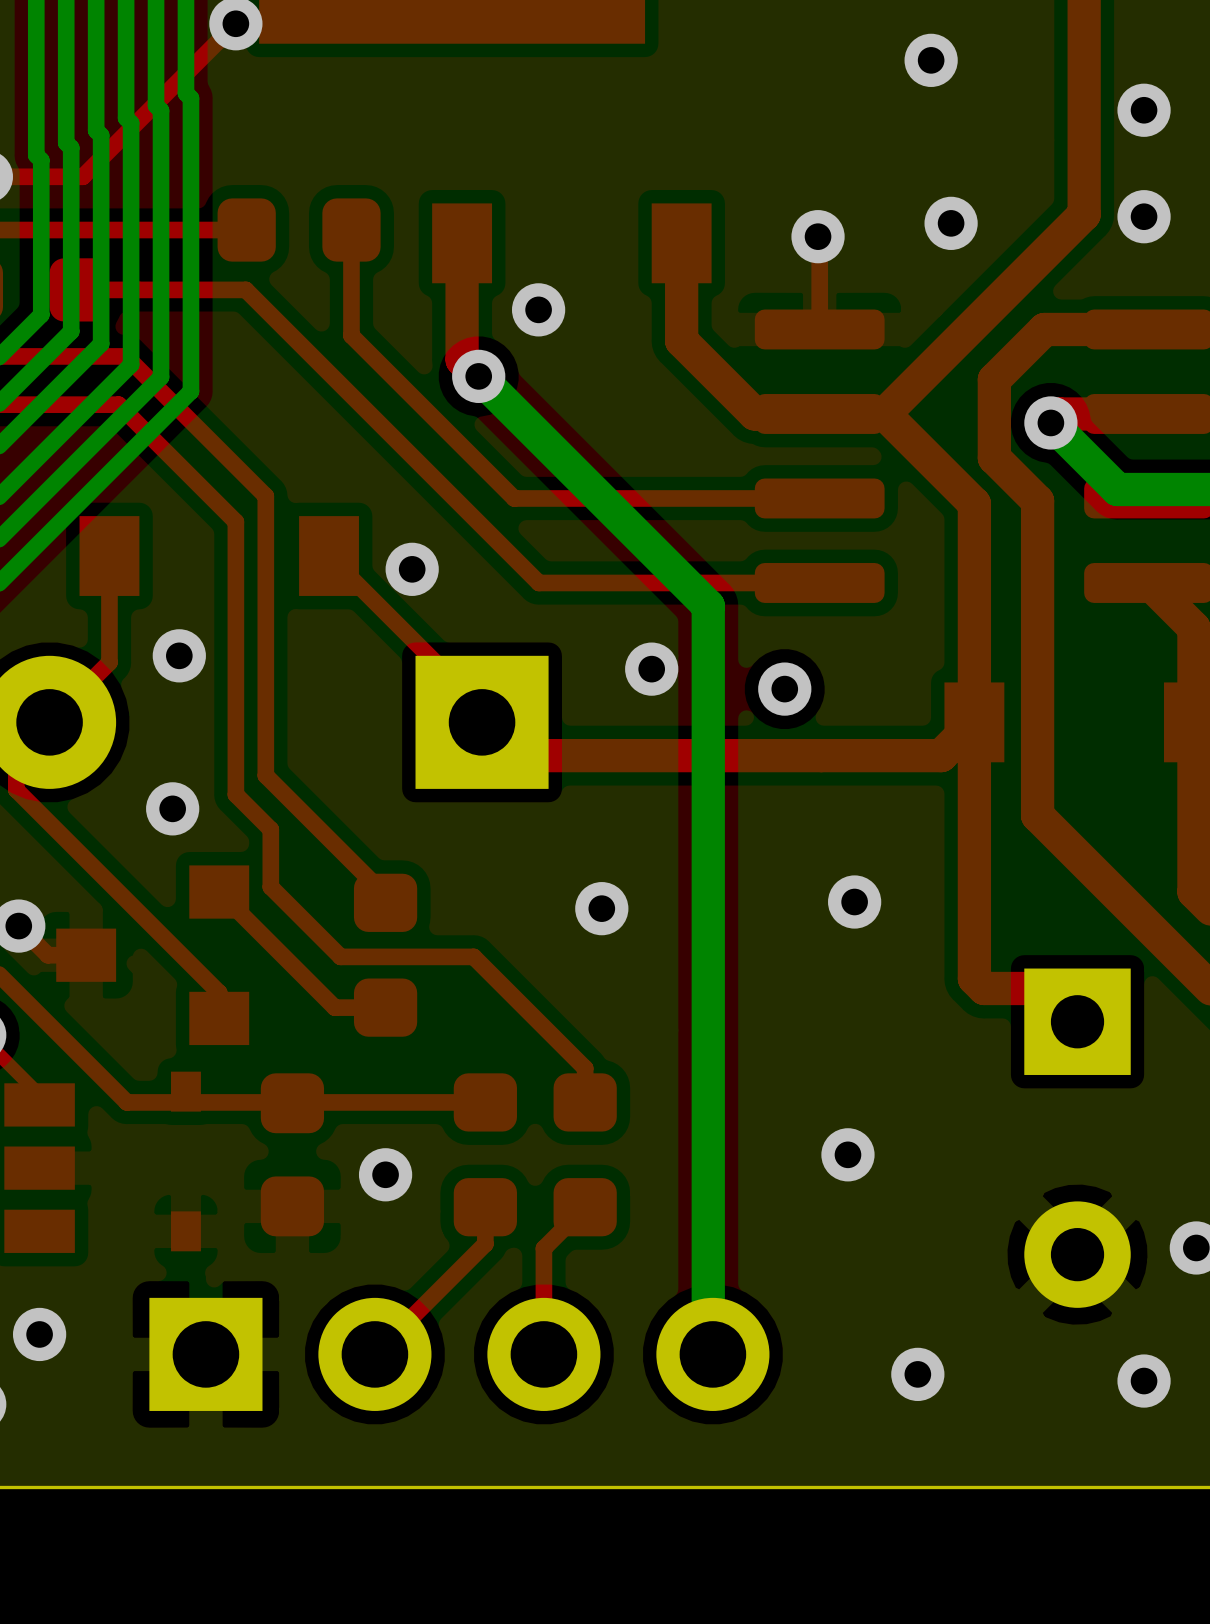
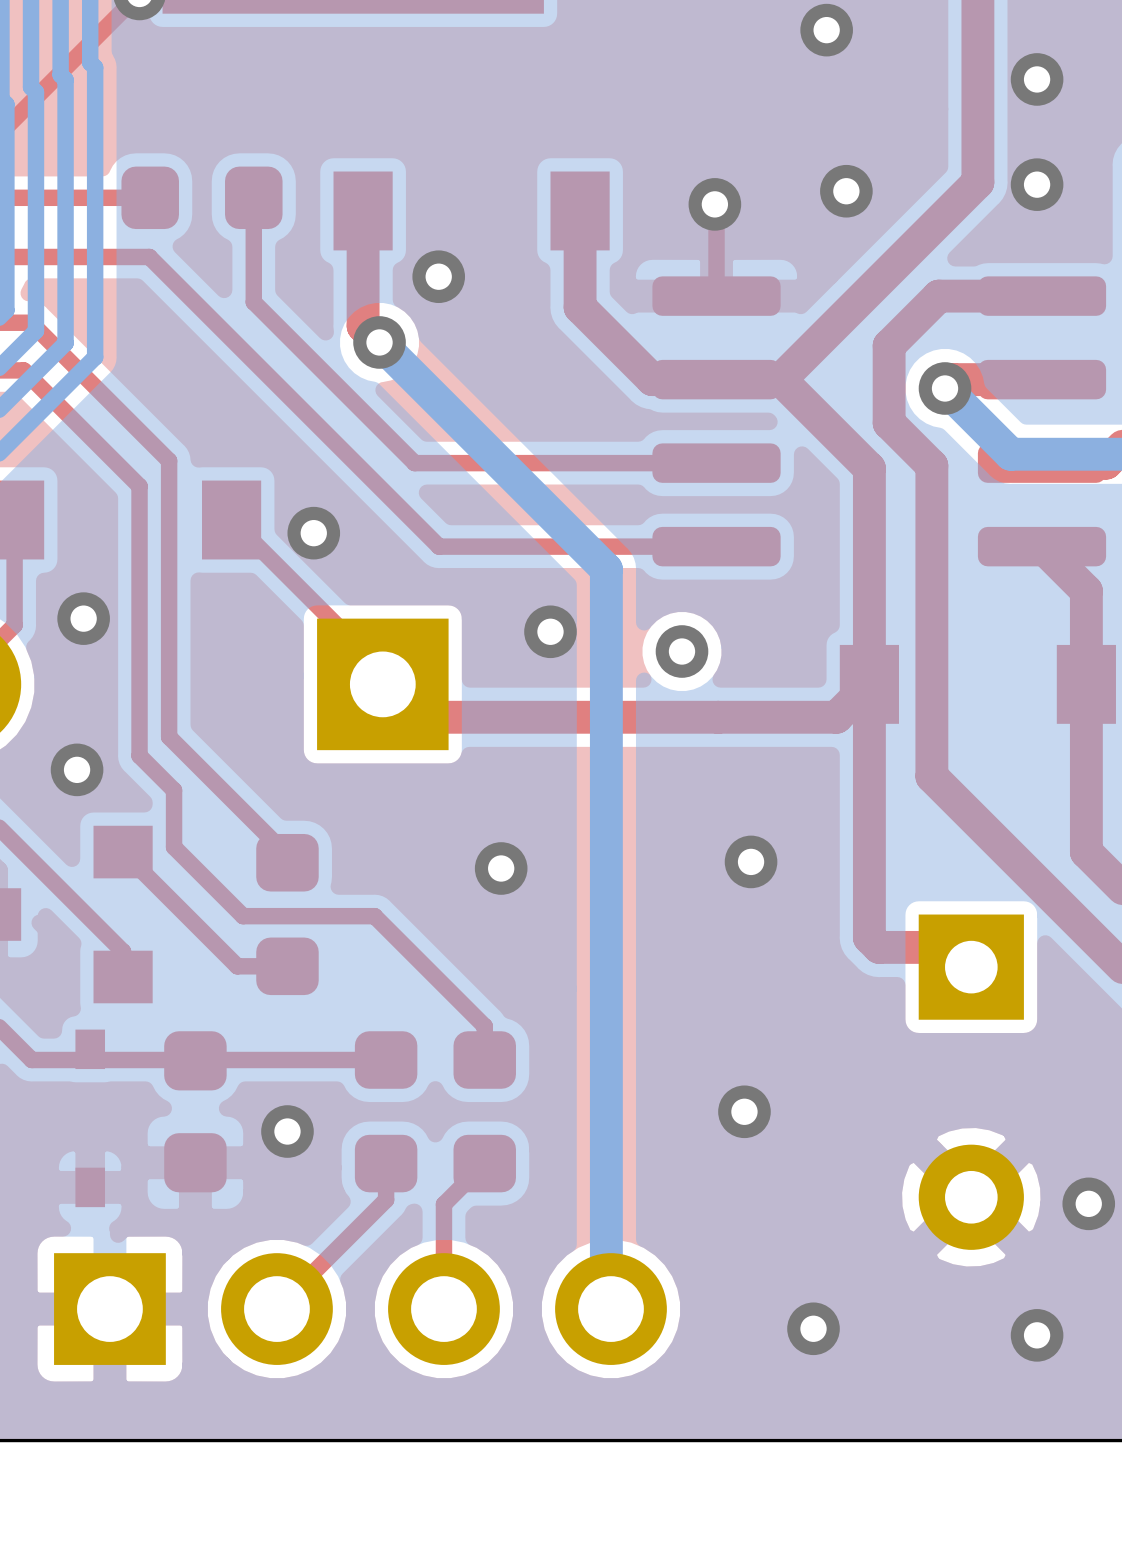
part position: (1077, 1138) -> (971, 1082)

